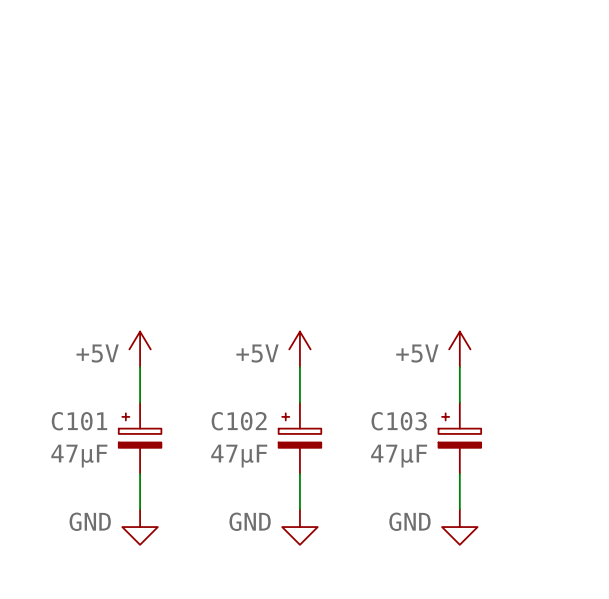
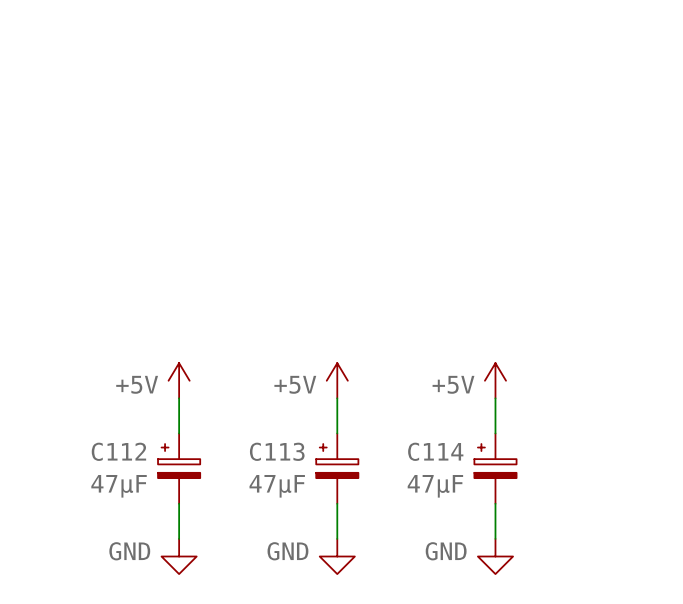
C101 name: C101 (79, 421) -> C112 (118, 451)
C102 name: C102 (239, 421) -> C113 (277, 451)
C103 name: C103 (399, 421) -> C114 (435, 451)

